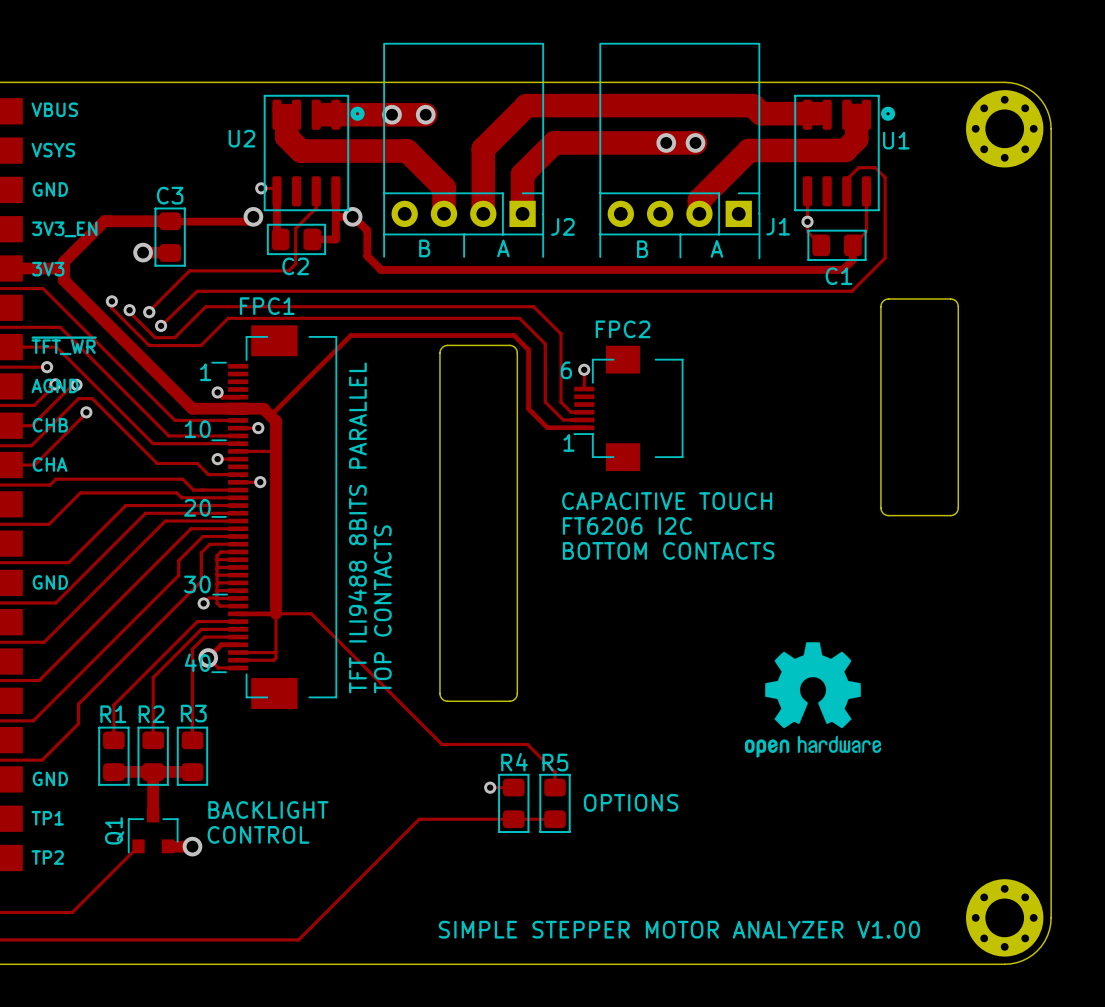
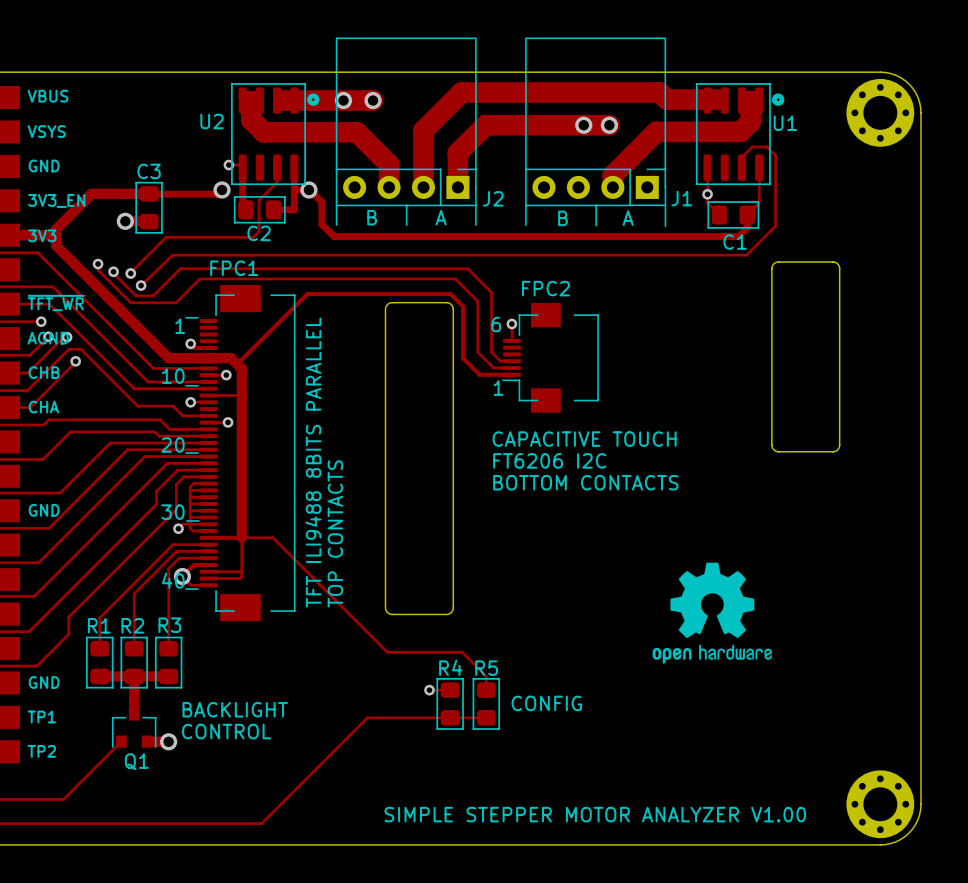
text: OPTIONS (631, 802) -> CONFIG (546, 703)
Q1 footprint: [127, 808, 179, 854] -> [111, 708, 157, 748]
Q1 name rotation: 0° (114, 830) -> 90° clockwise (136, 761)
Q1 name position: Q1 (114, 830) -> Q1 (136, 761)

